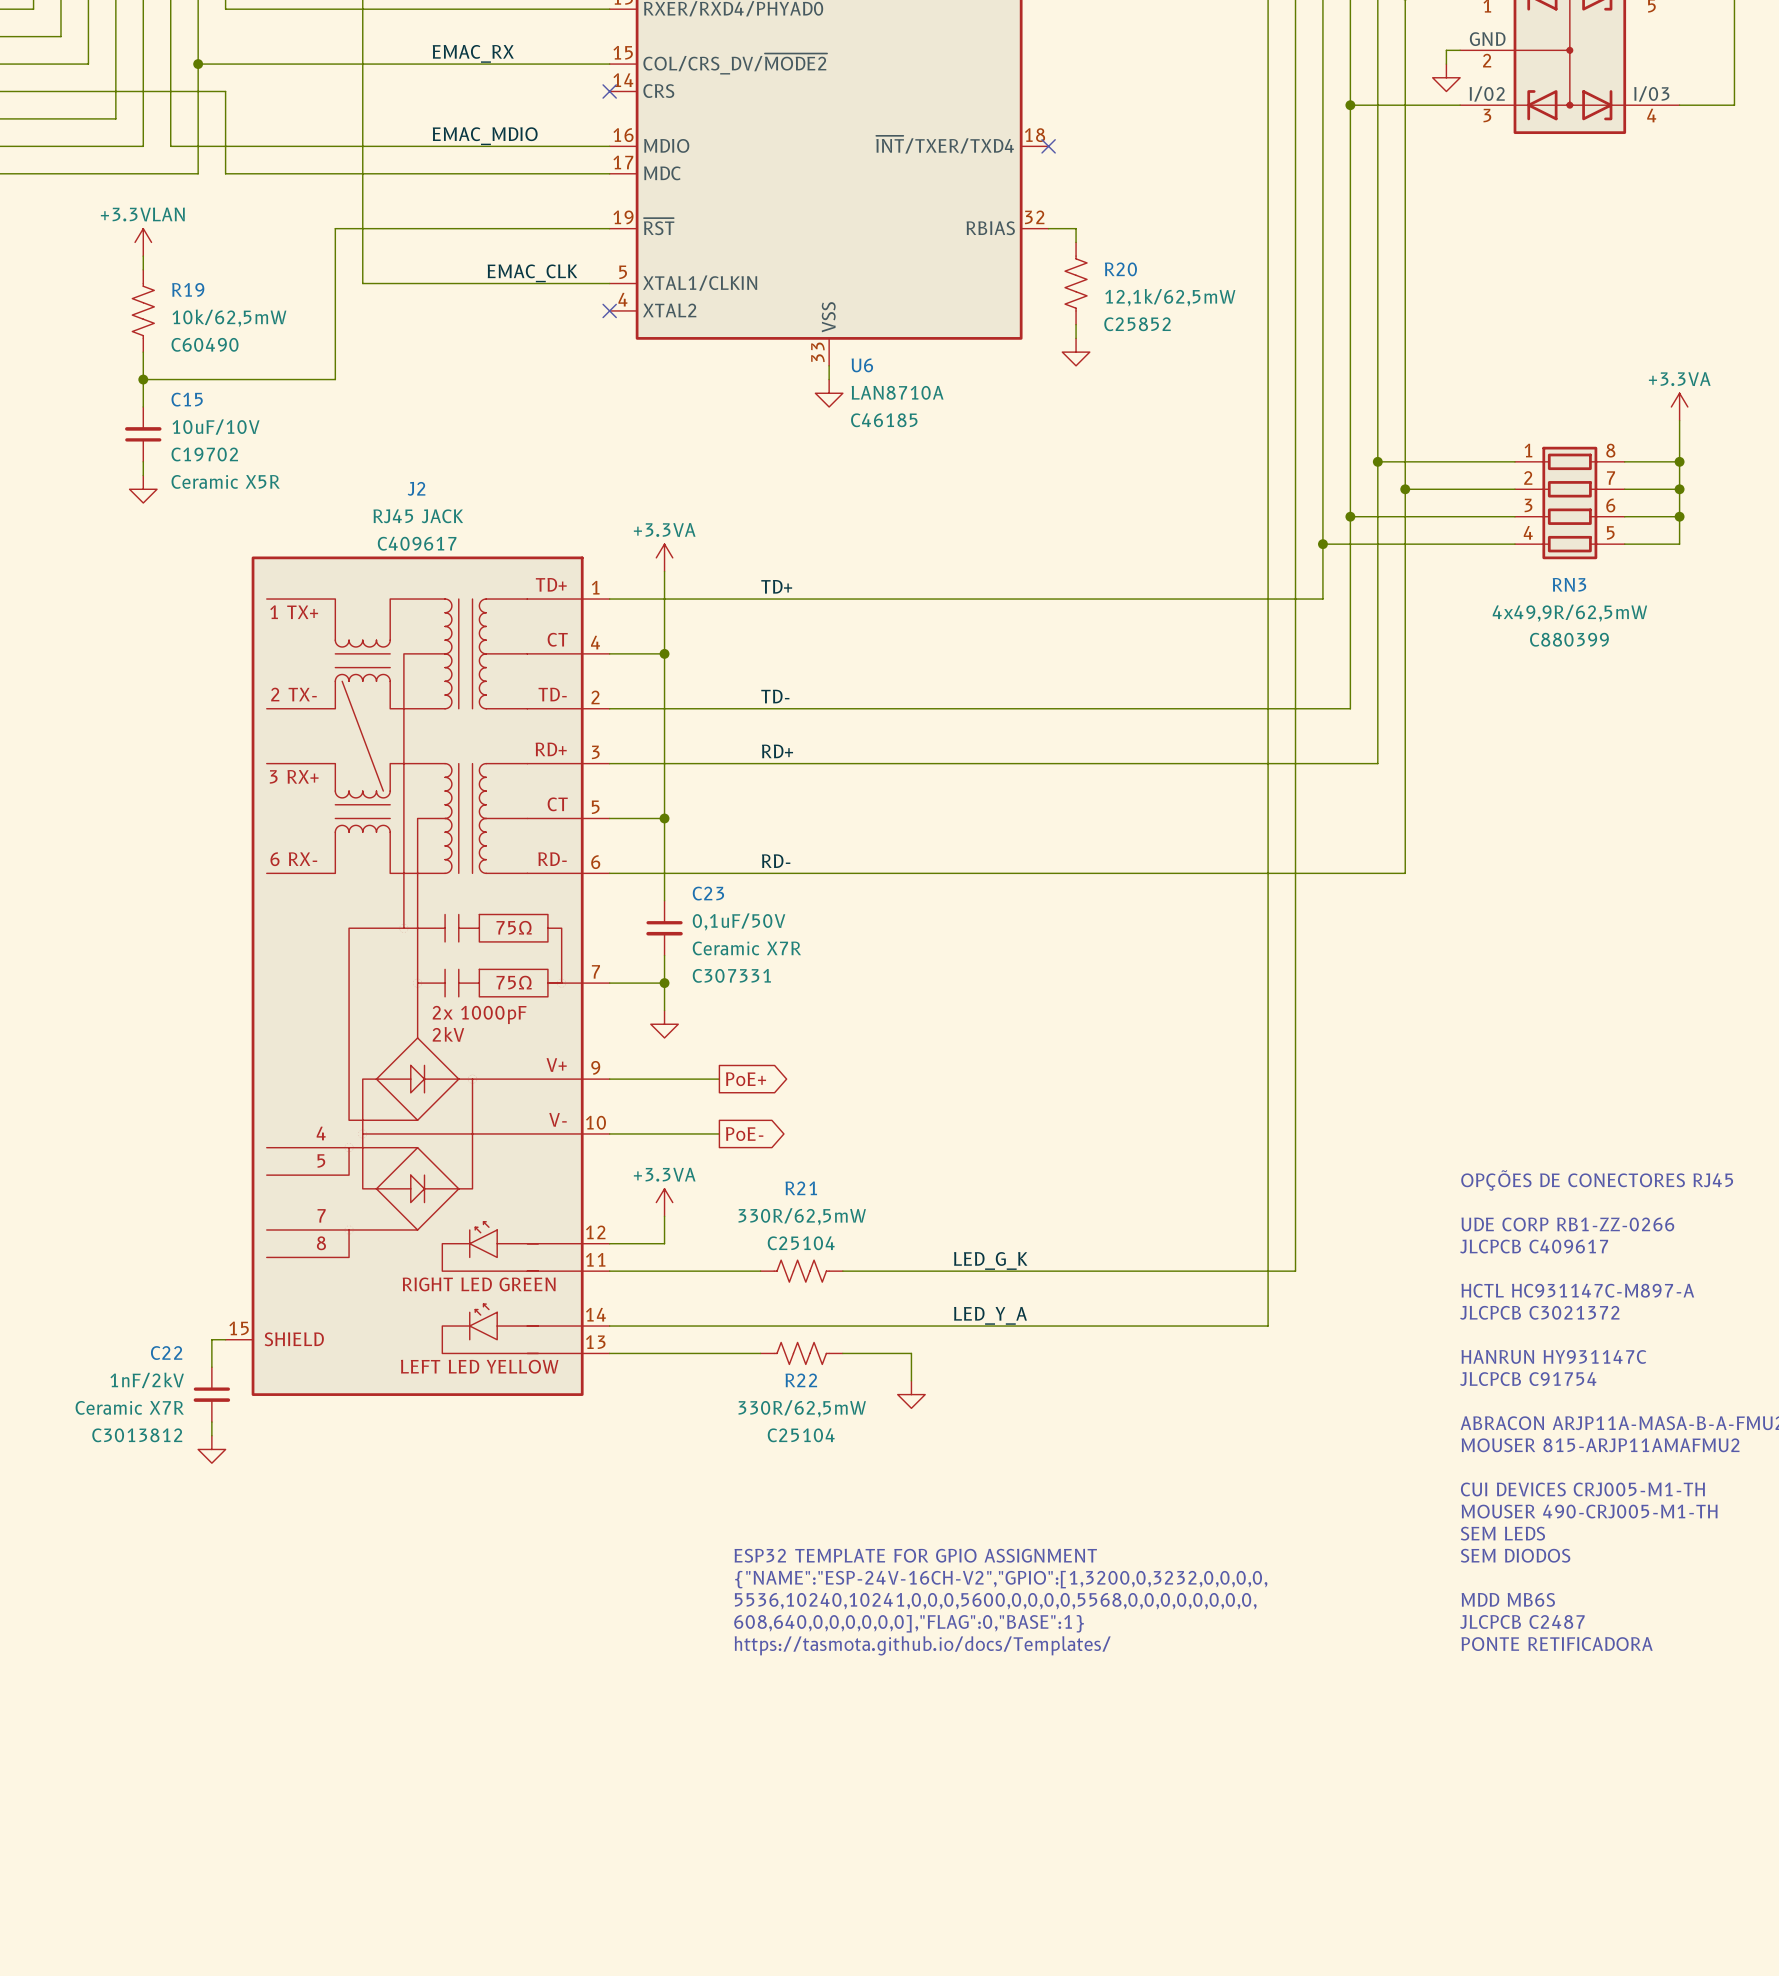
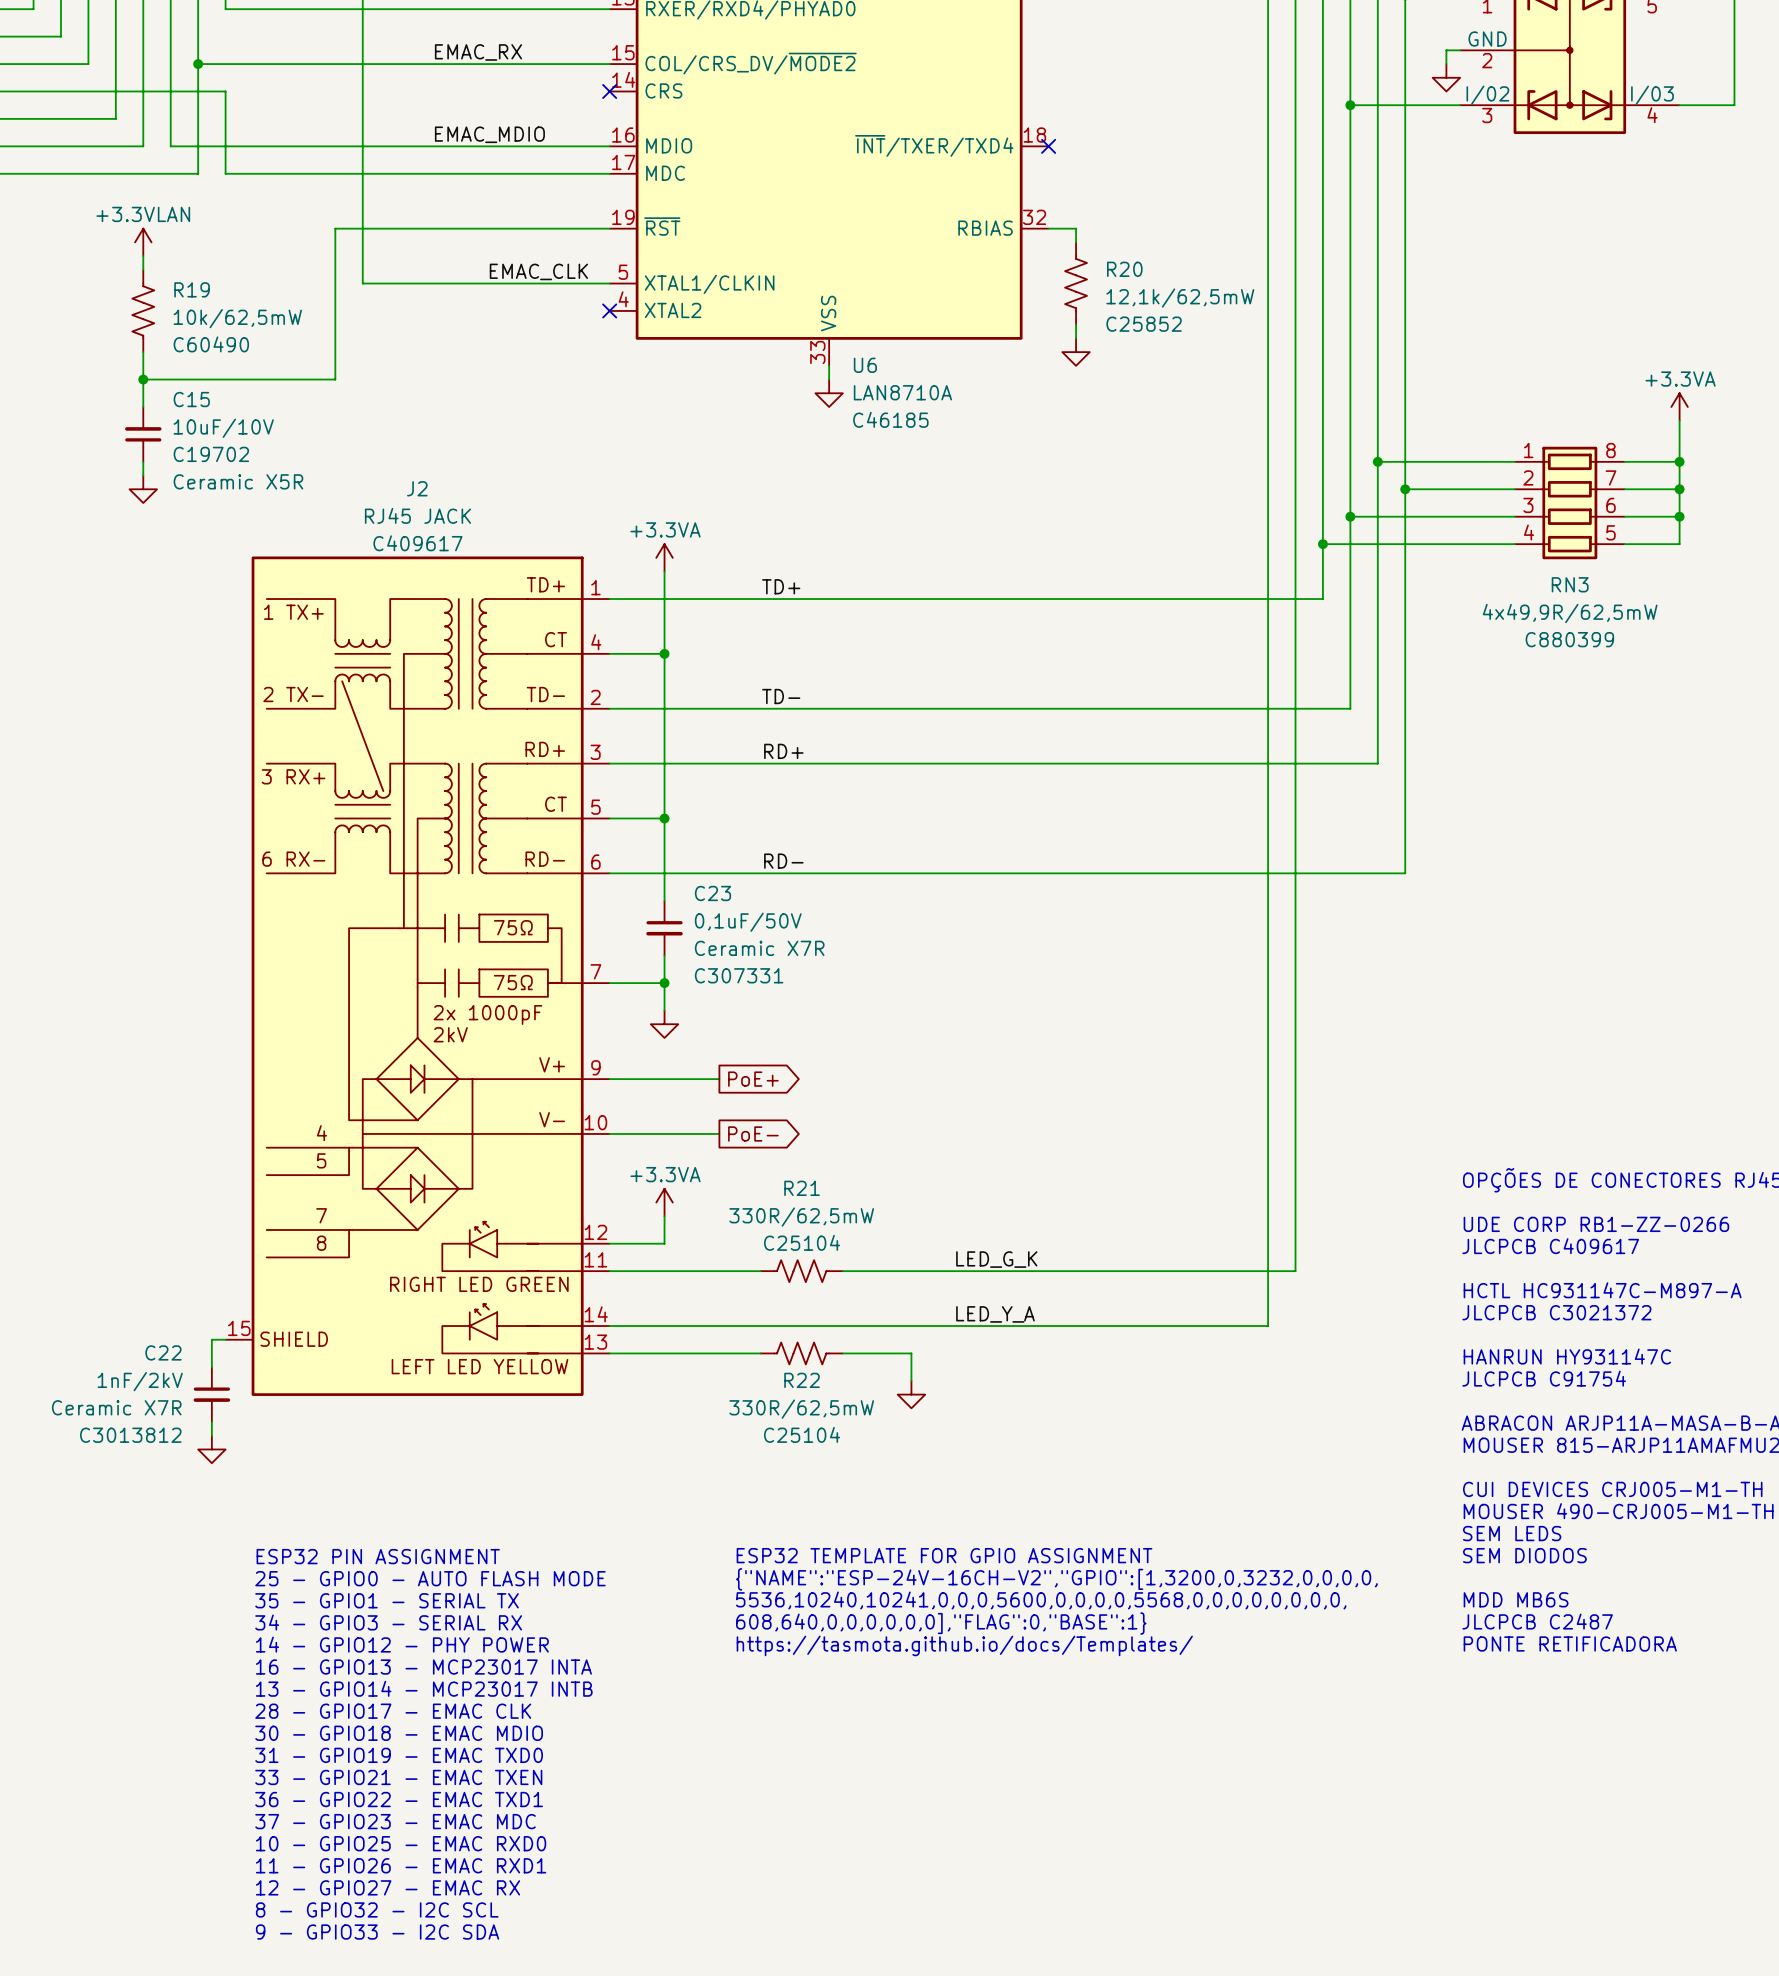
text: none -> ESP32 PIN ASSIGNMENT (378, 1556)
text: none -> 25 - GPIO0 - AUTO FLASH MODE (430, 1578)
text: none -> 35 - GPIO1 - SERIAL TX (387, 1600)
text: none -> 34 - GPIO3 - SERIAL RX (388, 1622)
text: none -> 14 - GPIO12 - PHY POWER (402, 1644)
text: none -> 16 - GPIO13 - MCP23017 INTA (423, 1667)
text: none -> 13 - GPIO14 - MCP23017 INTB (424, 1688)
text: none -> 28 - GPIO17 - EMAC CLK (393, 1711)
text: none -> 30 - GPIO18 - EMAC MDIO (399, 1733)
text: none -> 31 - GPIO19 - EMAC TXD0 (399, 1755)
text: none -> 33 - GPIO21 - EMAC TXEN (398, 1777)
text: none -> 36 - GPIO22 - EMAC TXD1 (399, 1799)
text: none -> 37 - GPIO23 - EMAC MDC (395, 1821)
text: none -> 10 - GPIO25 - EMAC RXD0 (401, 1843)
text: none -> 11 - GPIO26 - EMAC RXD1 (401, 1865)
text: none -> 12 - GPIO27 - EMAC RX (388, 1887)
text: none -> 8 - GPIO32 - I2C SCL (377, 1909)
text: none -> 9 - GPIO33 - I2C SDA (377, 1932)

